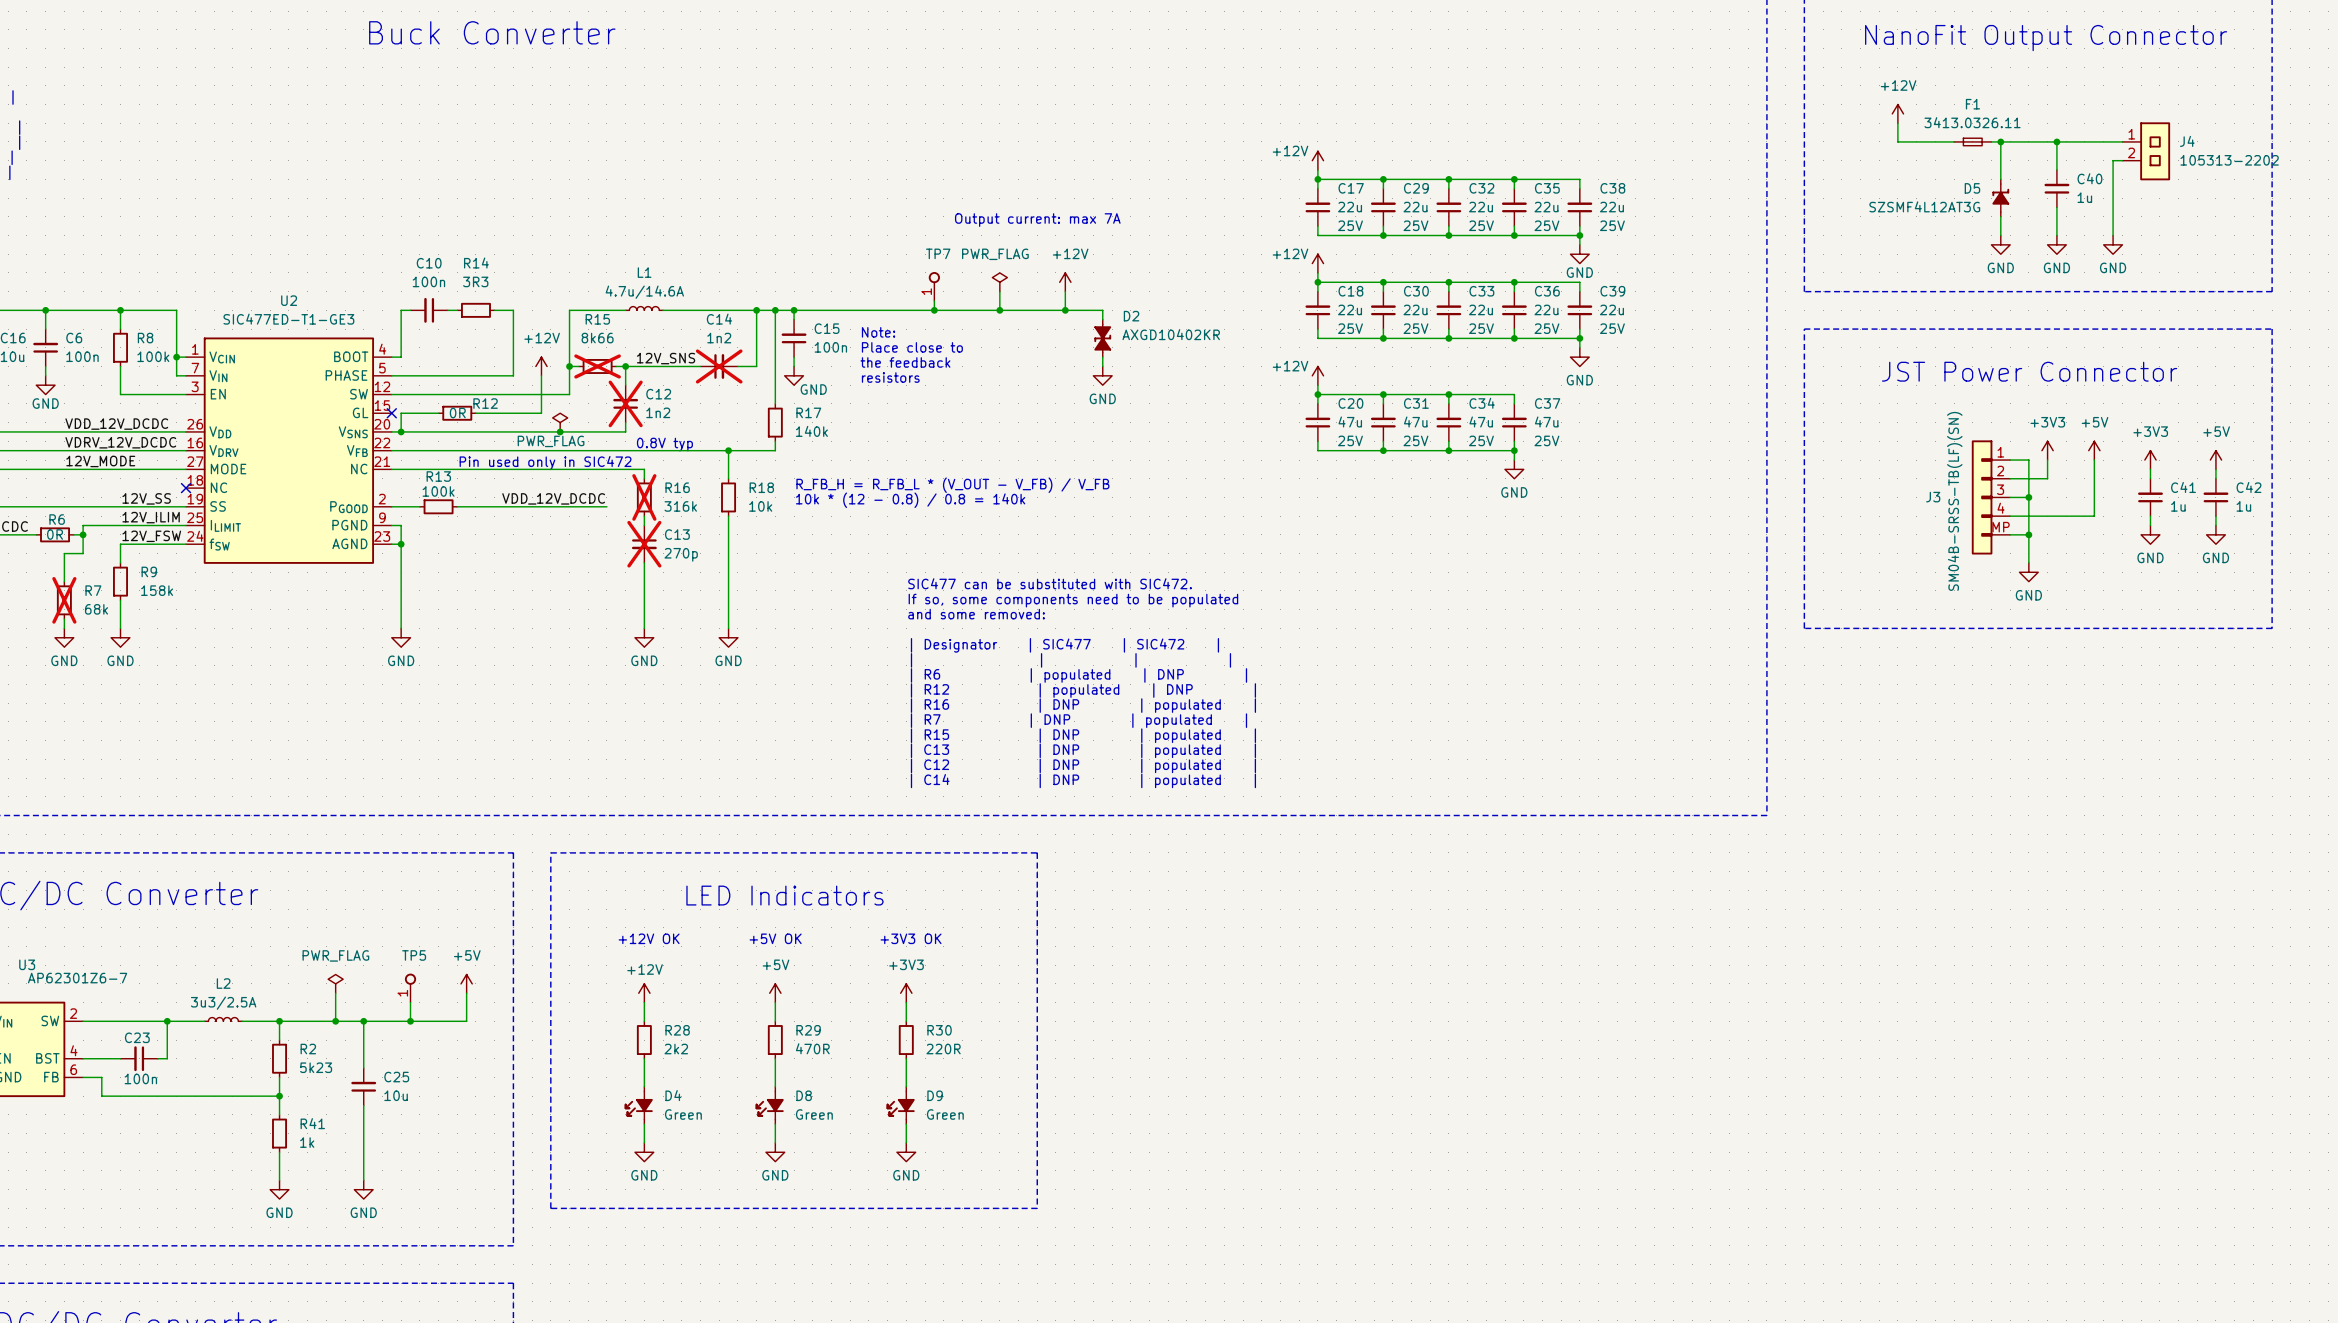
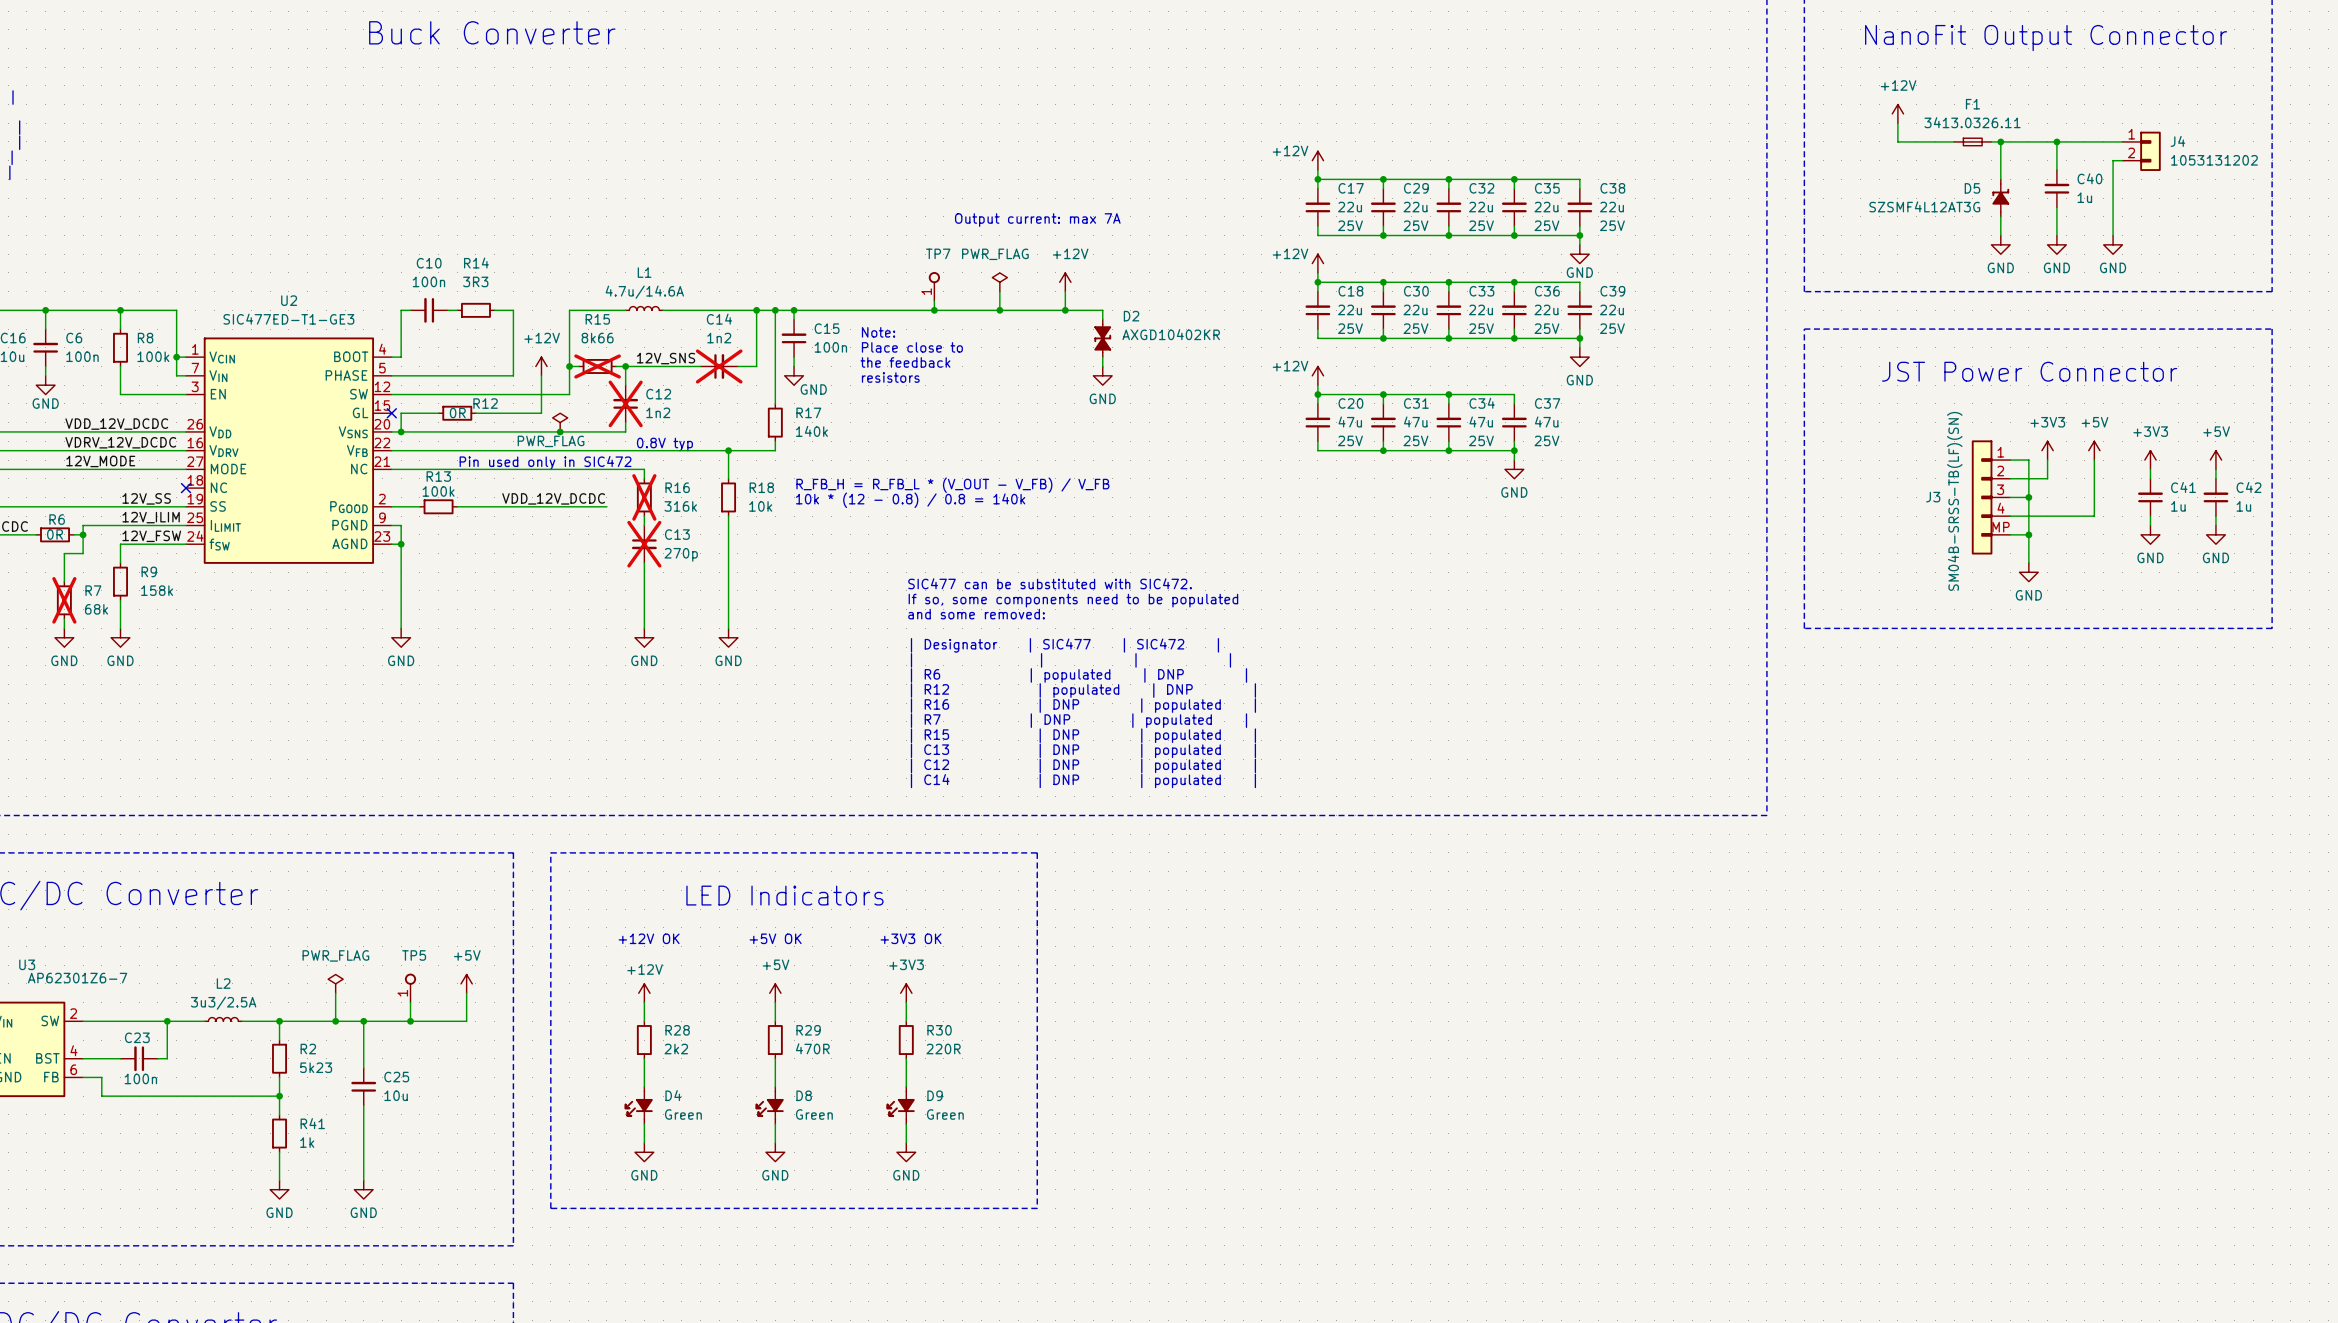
J4 symbol: [2122, 122, 2171, 181] -> [2122, 131, 2161, 171]
J4 text: 105313-2202 (2229, 160) -> 1053131202 (2214, 160)

